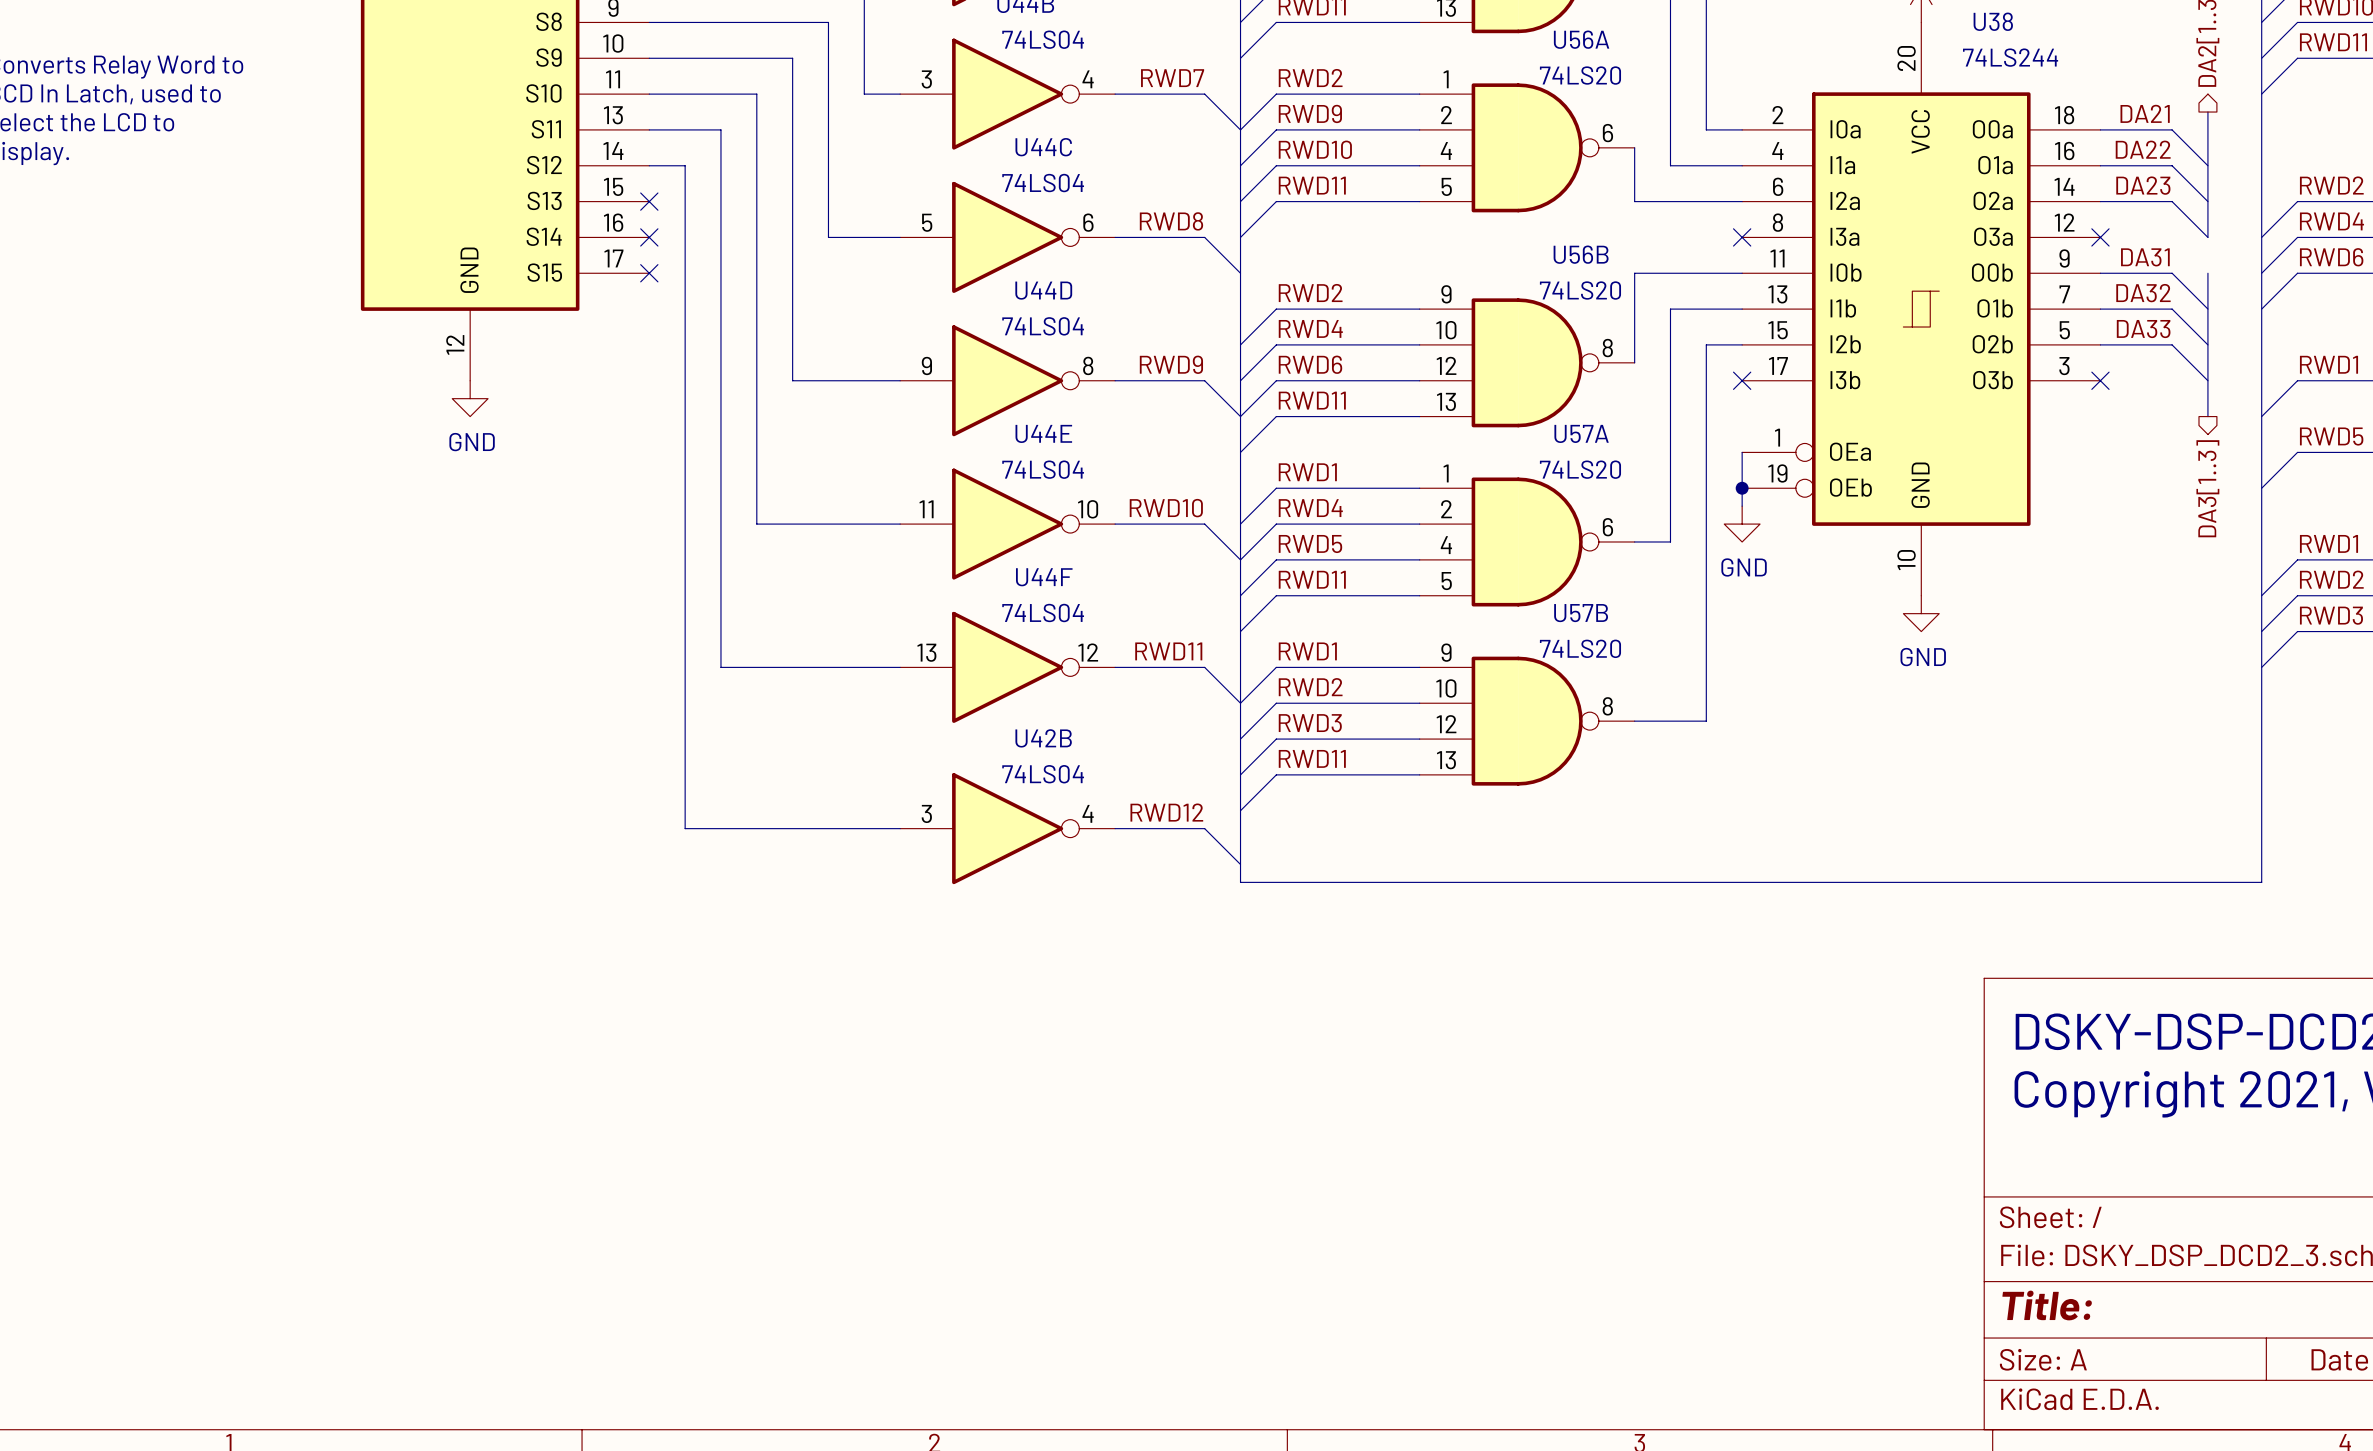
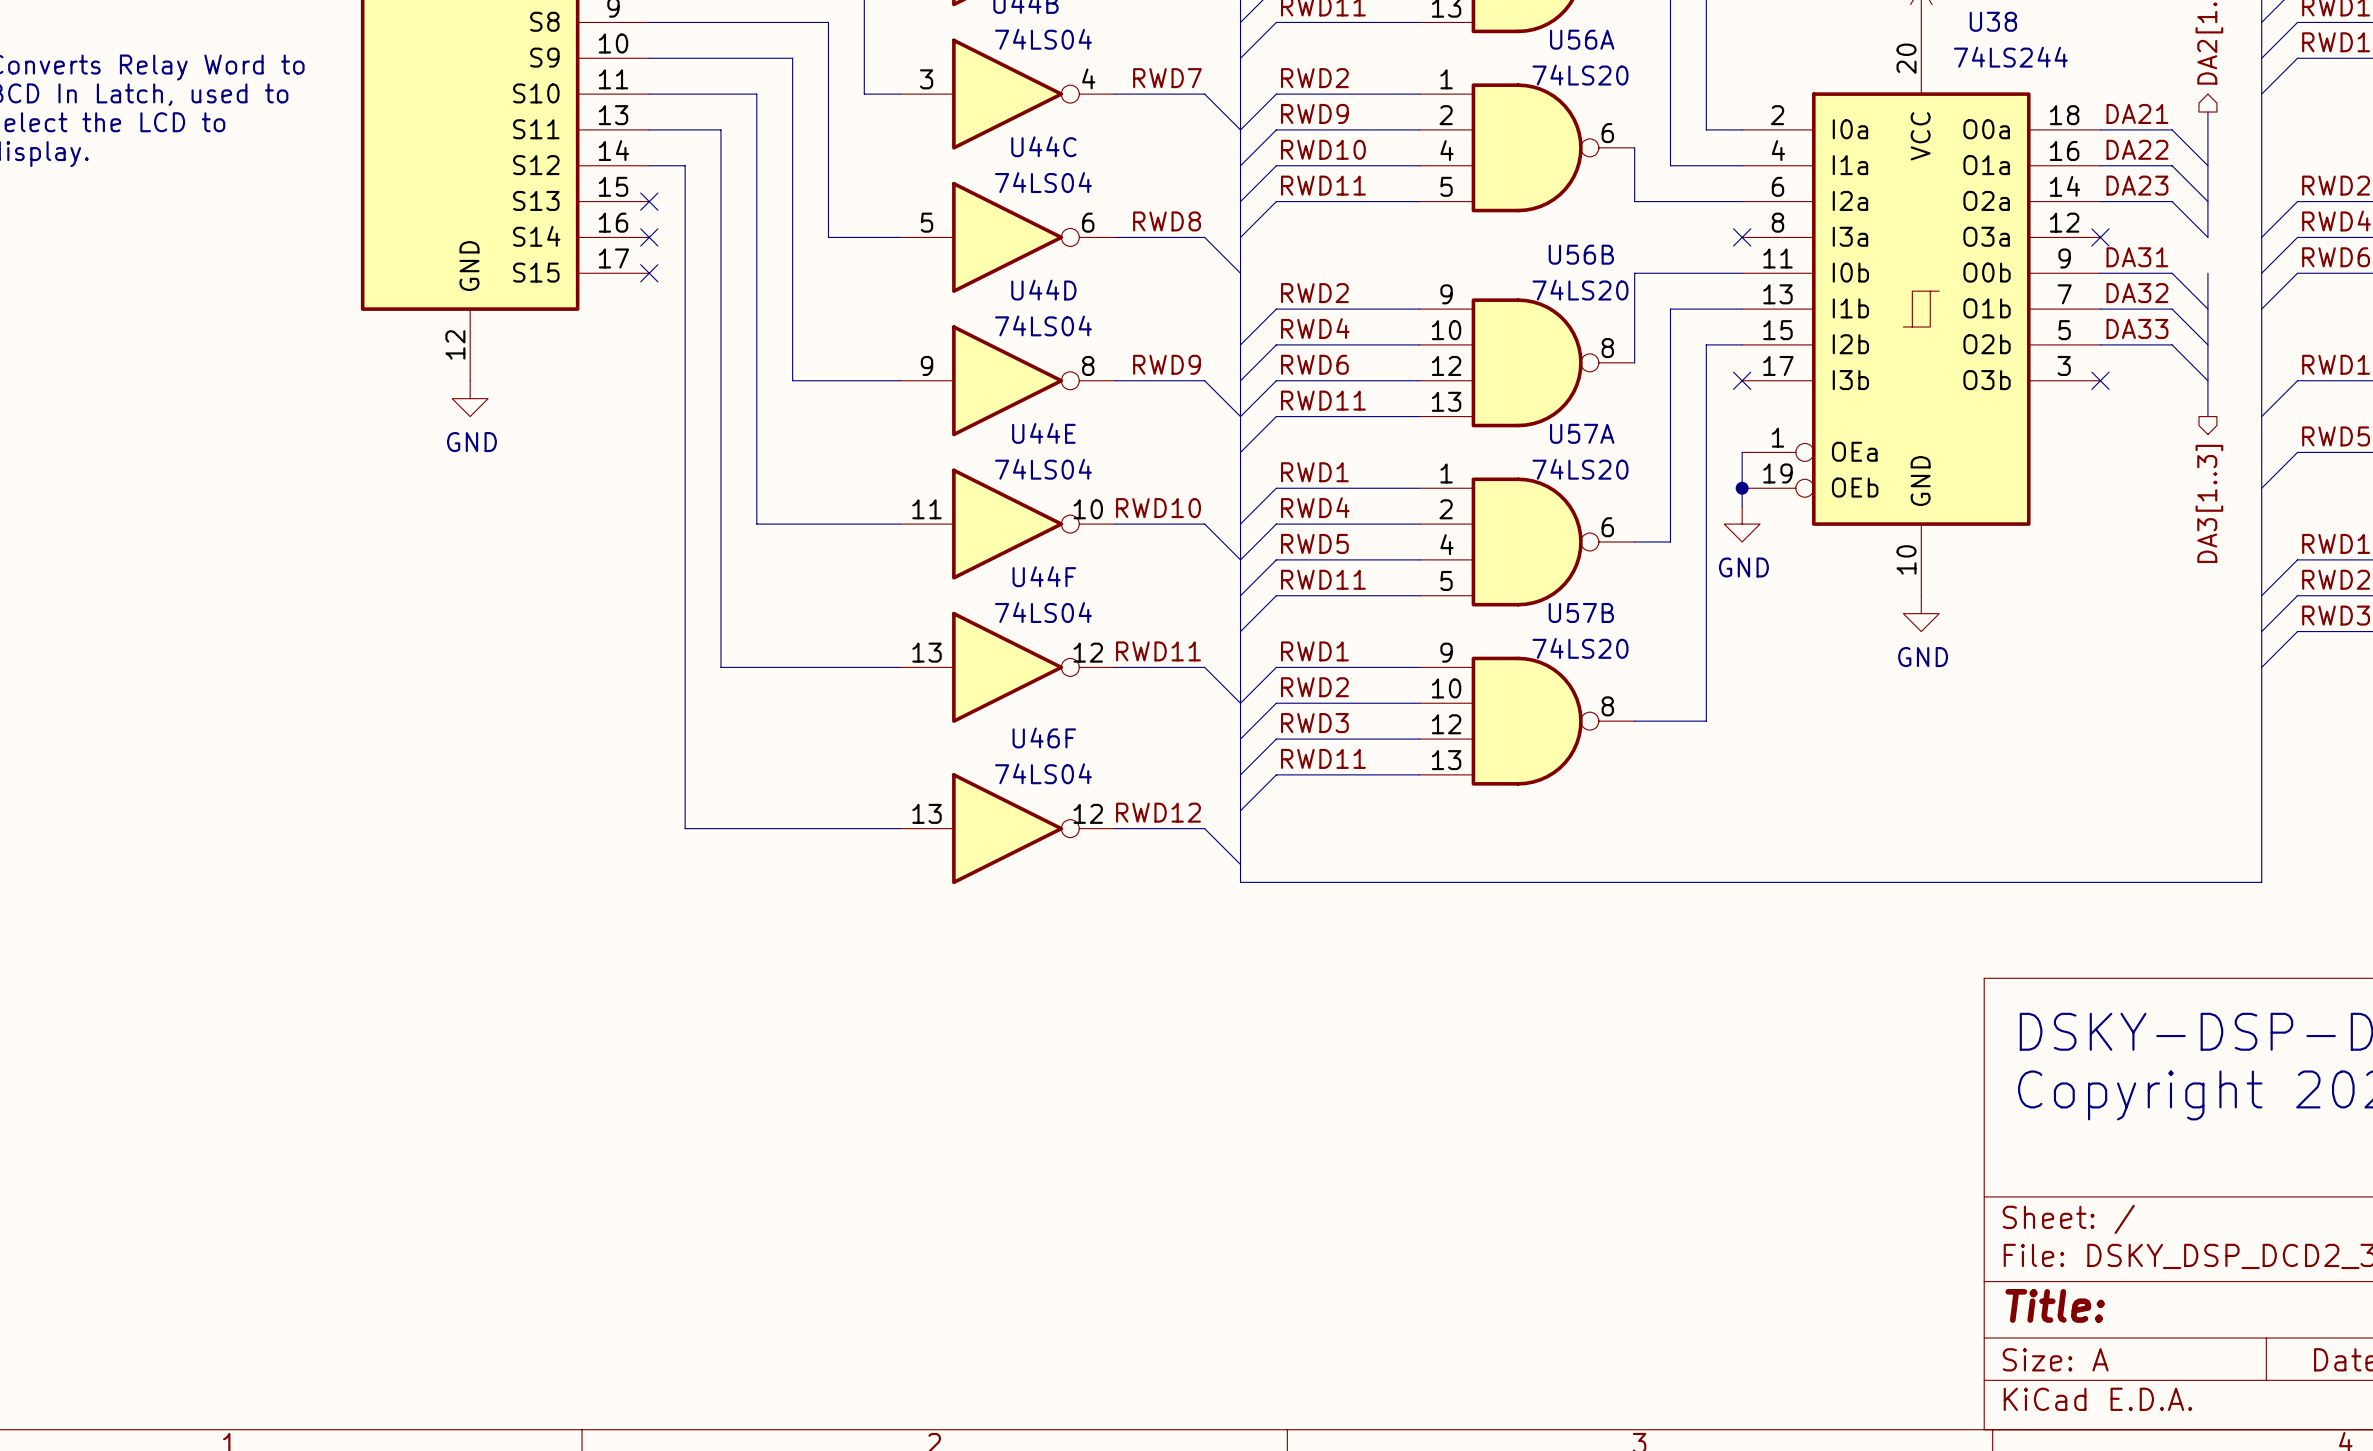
U42B name: U42B (1043, 738) -> U46F (1044, 737)
U42B pin number: 3 (926, 813) -> 13 (927, 813)
U42B pin number: 4 (1088, 813) -> 12 (1088, 813)

